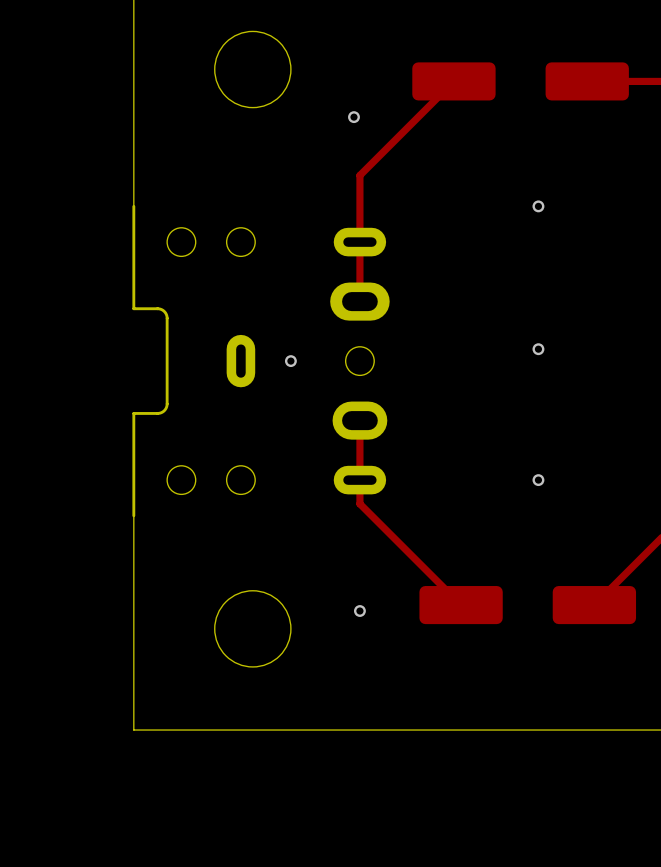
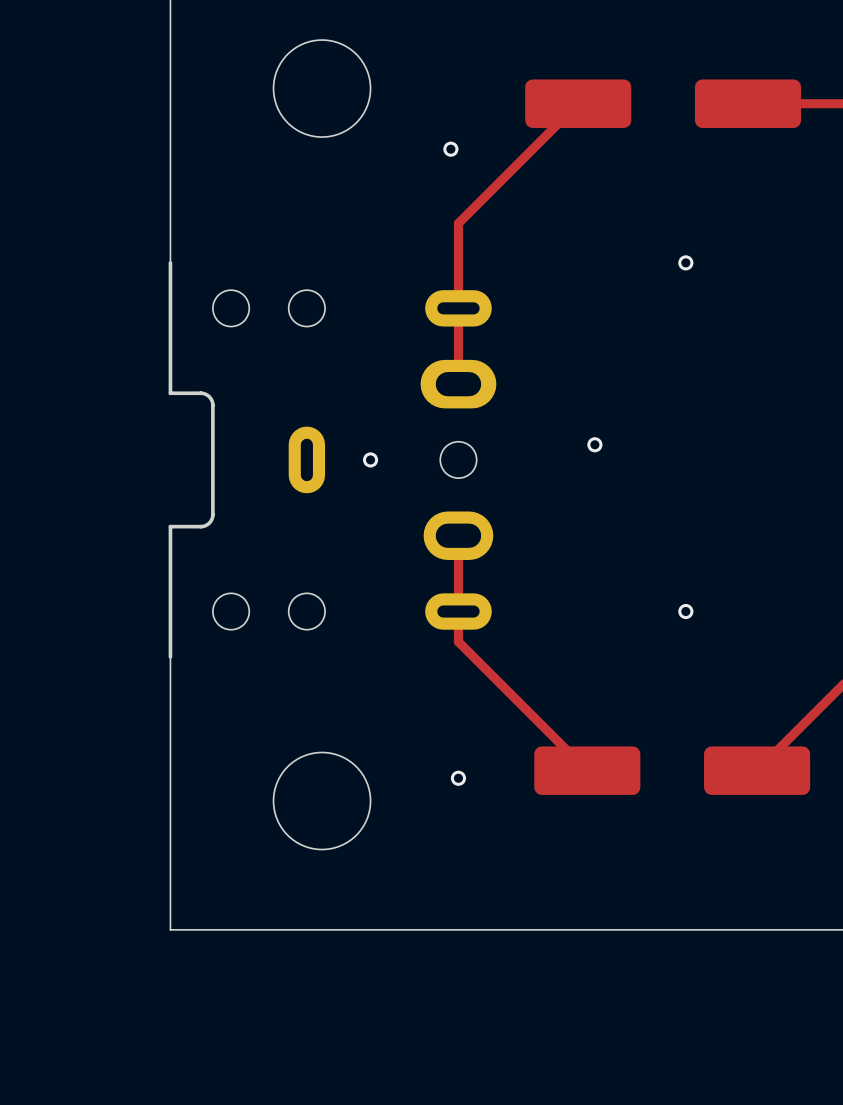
via position: (538, 349) -> (594, 444)

